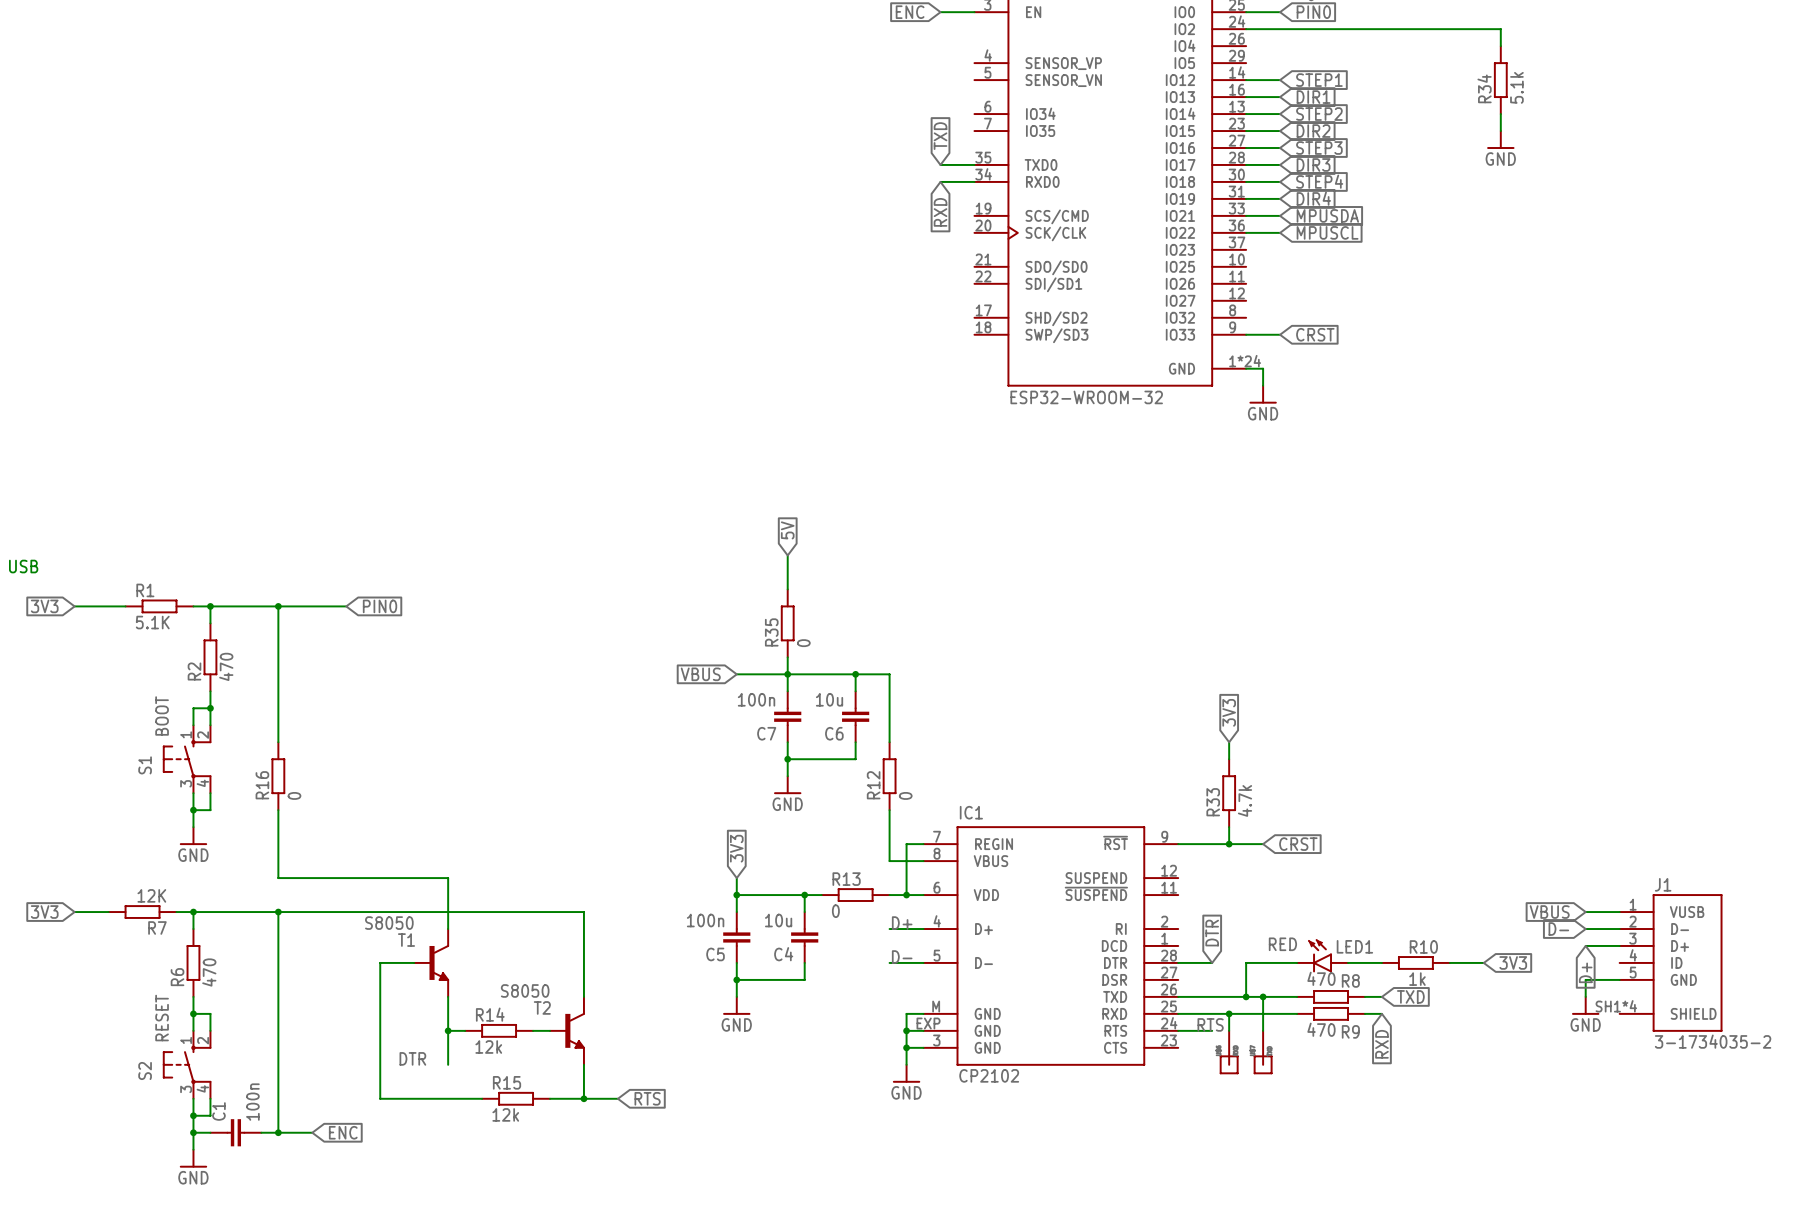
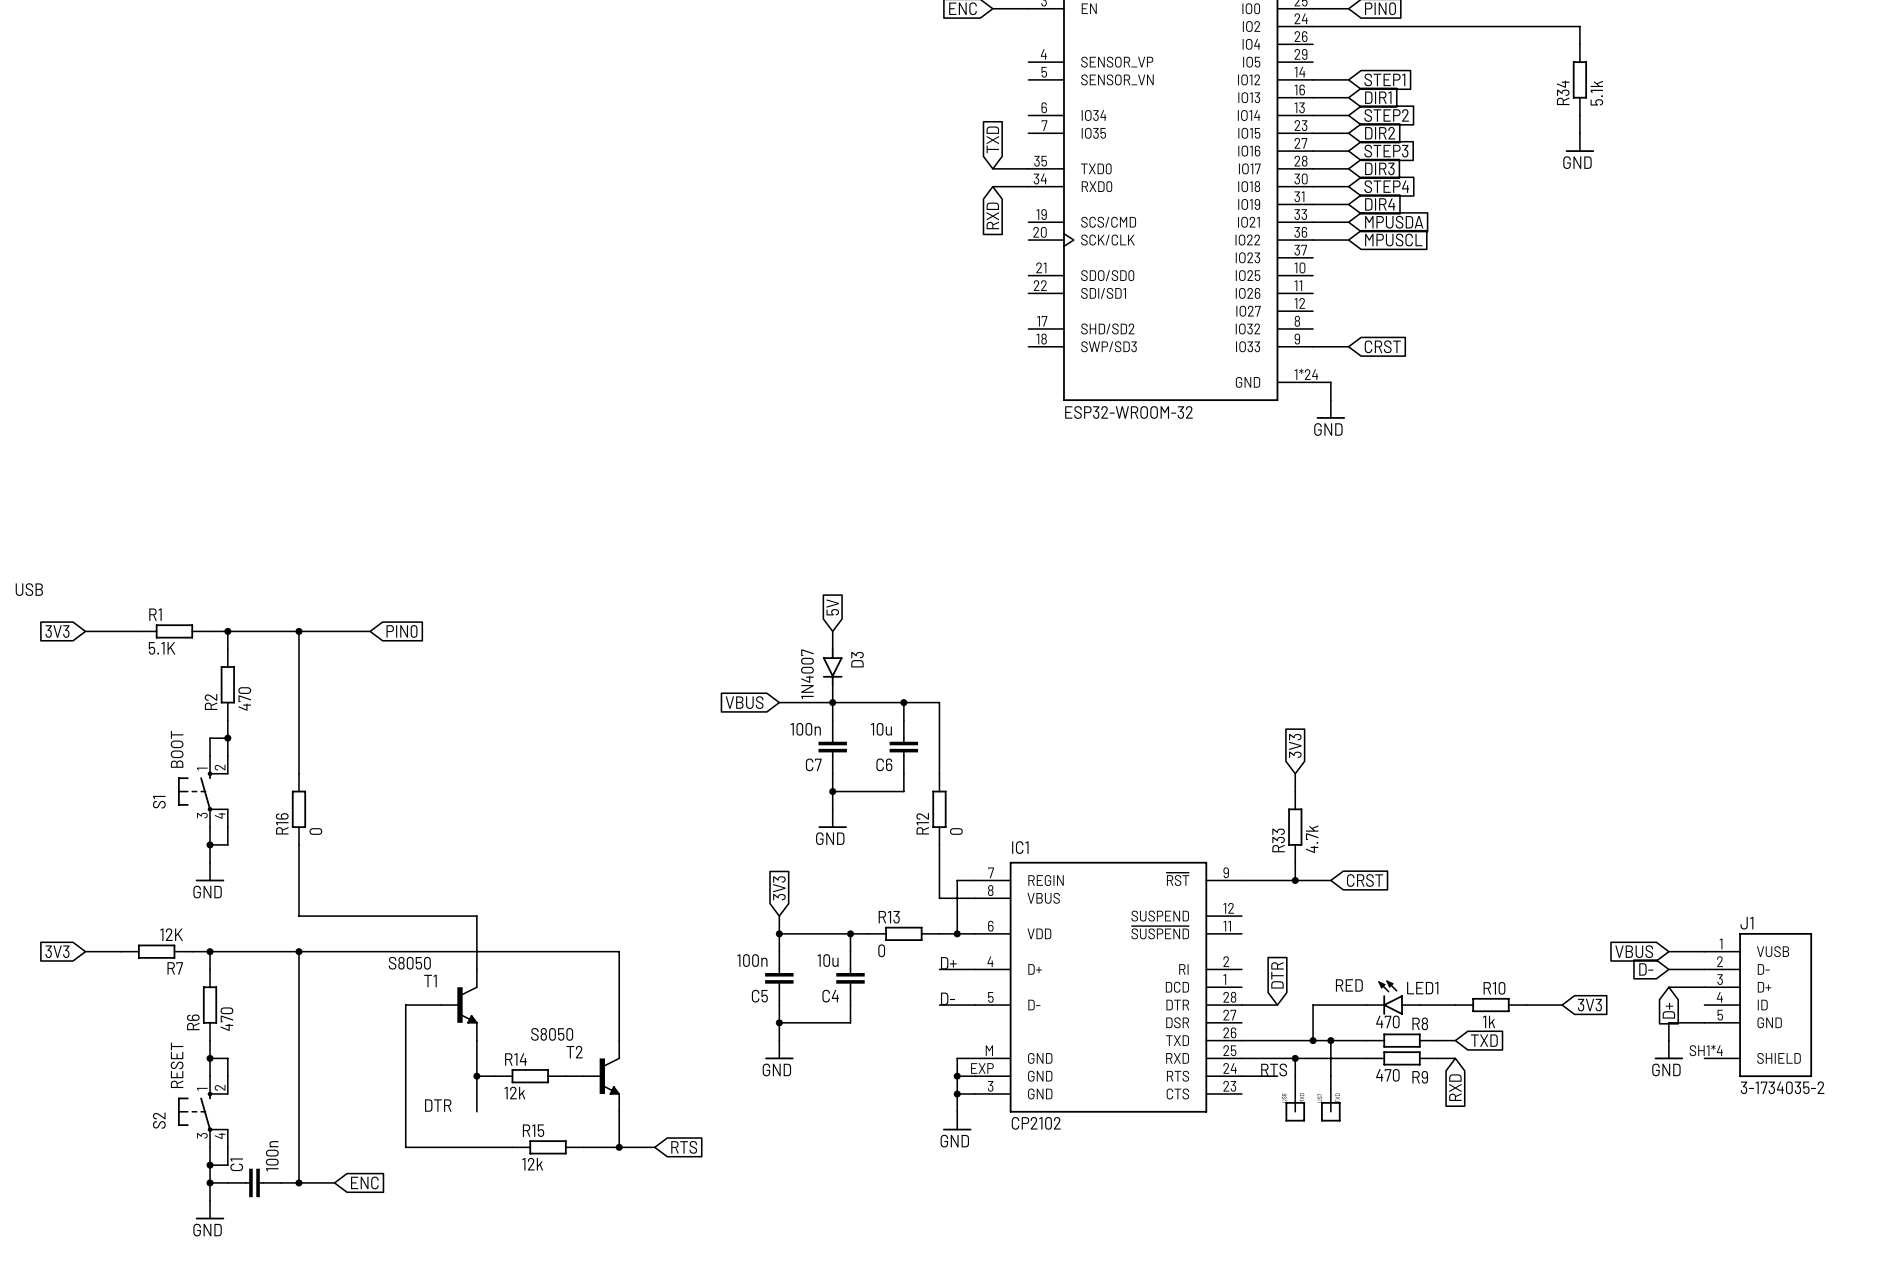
global label position: 5V (787, 530) -> 5V (832, 607)
wire: (787, 555) (787, 589) -> none
wire: none -> (832, 631) (832, 649)
R35: 0 (787, 623) -> none
D3: none -> 1N4007 (832, 667)

